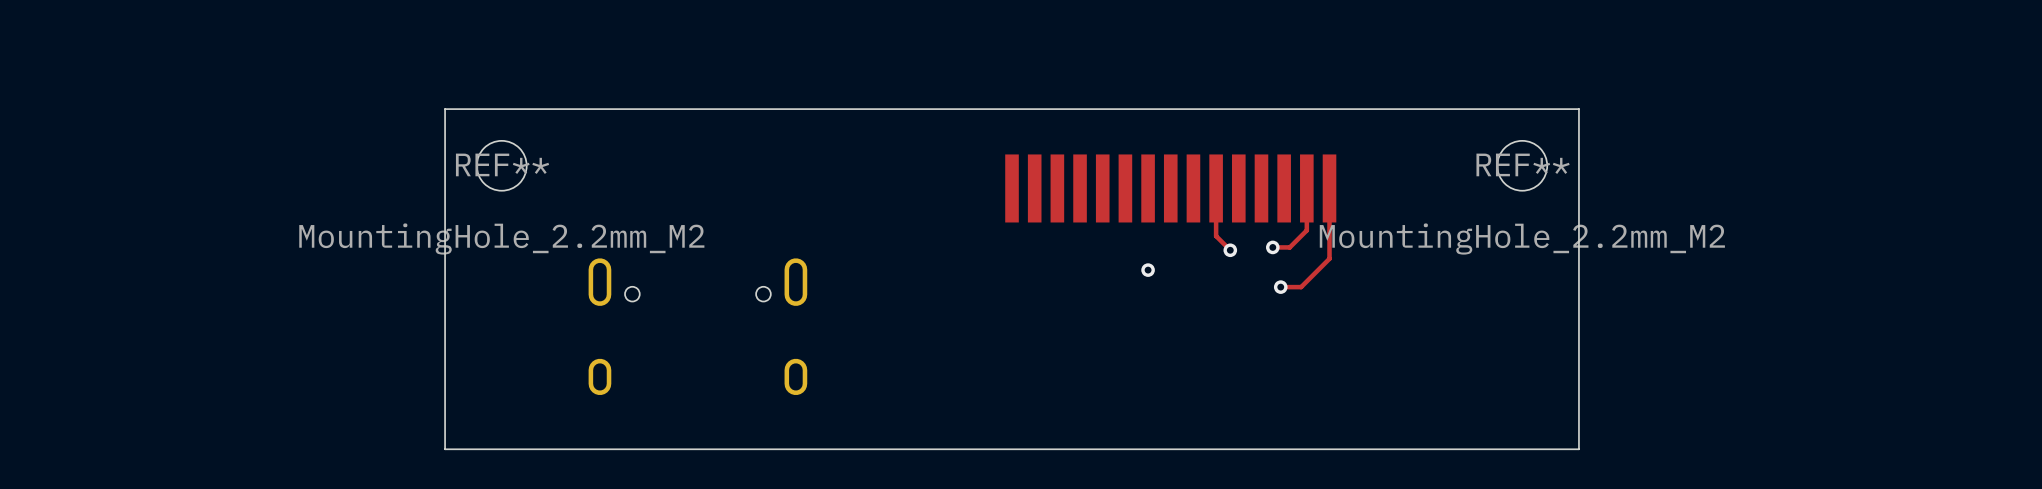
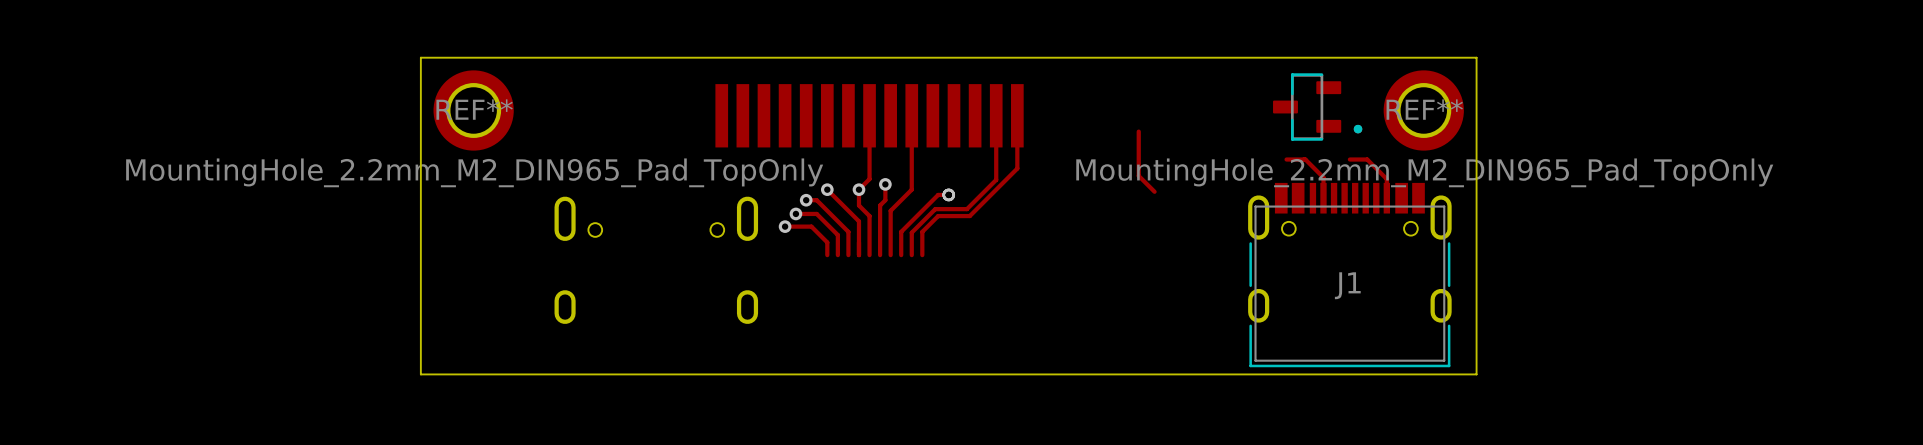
REF** footprint: [476, 140, 527, 191] -> [433, 70, 514, 151]
REF** footprint: [1497, 140, 1548, 191] -> [1383, 70, 1464, 151]
part: none -> (1317, 107)
track: none -> (869, 115) (869, 179) (858, 189) (858, 205) (869, 216) (869, 255)
track: none -> (911, 115) (911, 189) (890, 210) (890, 255)
track: none -> (996, 115) (996, 179) (966, 209) (935, 209) (911, 232) (911, 255)
track: none -> (1017, 115) (1017, 168) (969, 216) (938, 216) (922, 231) (922, 255)
part position: (1170, 188) -> (869, 115)
track: (1306, 188) (1306, 230) (1289, 247) (1272, 247) -> none
track: (1329, 188) (1329, 258) (1301, 287) (1280, 287) -> none
track: none -> (1286, 159) (1305, 159) (1323, 177) (1323, 198)
track: none -> (1349, 159) (1367, 159) (1386, 179) (1386, 199)
REF** value: MountingHole_2.2mm_M2 (501, 239) -> MountingHole_2.2mm_M2_DIN965_Pad_TopOnly (474, 172)
REF** value: MountingHole_2.2mm_M2 (1522, 239) -> MountingHole_2.2mm_M2_DIN965_Pad_TopOnly (1424, 172)
track: none -> (885, 184) (885, 200) (880, 205) (880, 255)
via: none -> (885, 184)
via: (1272, 247) -> none
track: none -> (827, 189) (858, 221) (858, 255)
via: none -> (827, 189)
via: none -> (858, 189)
via: (1230, 250) -> none
track: none -> (943, 194) (938, 194) (901, 231) (901, 255)
via: none -> (948, 194)
track: none -> (806, 200) (816, 200) (848, 231) (848, 255)
via: none -> (806, 200)
via: (1148, 270) -> none
track: none -> (795, 213) (816, 213) (837, 235) (837, 255)
via: none -> (795, 213)
via: (1280, 287) -> none
track: none -> (785, 226) (811, 226) (827, 242) (827, 255)
via: none -> (785, 226)
J1: none -> (1349, 275)

